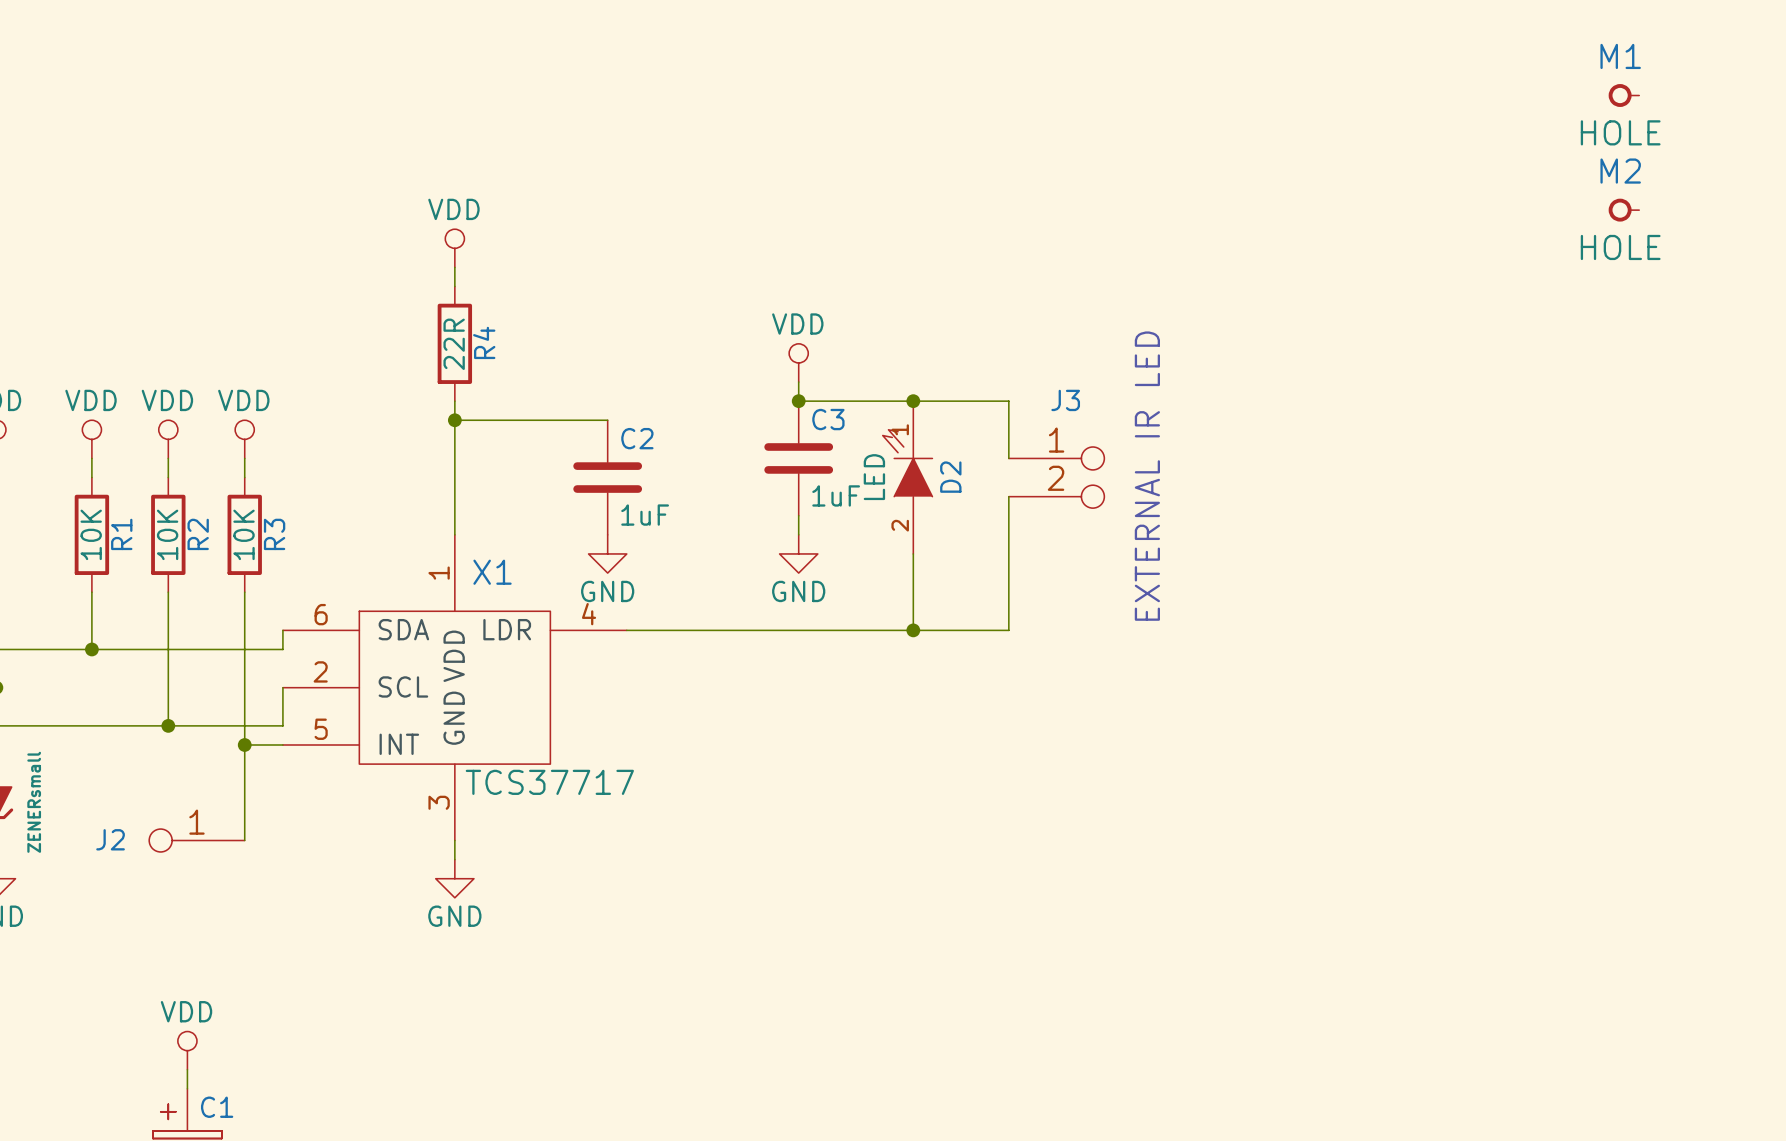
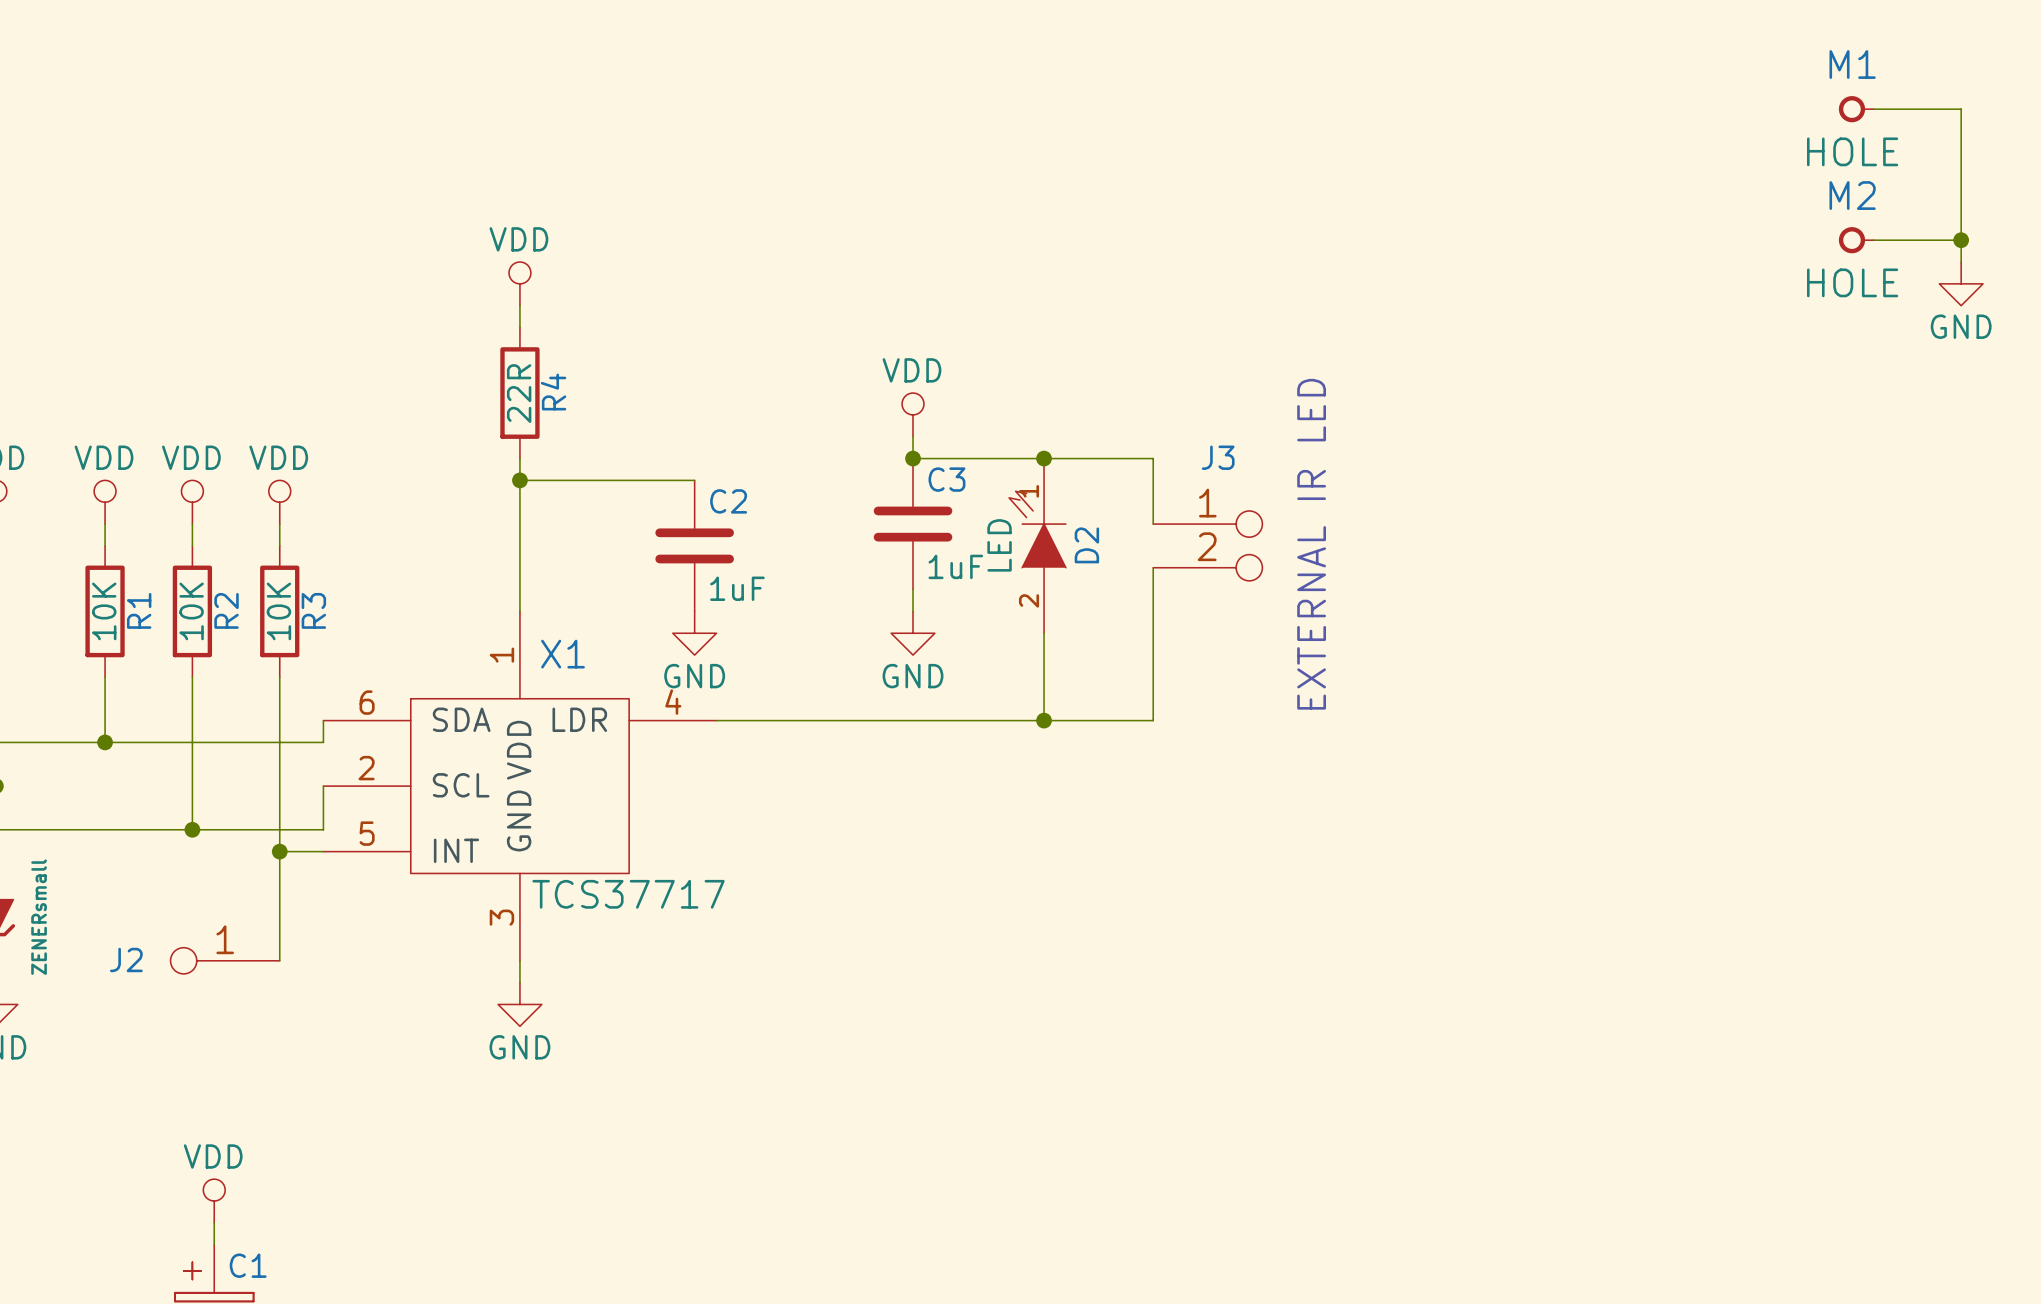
wire: none -> (1873, 109) (1961, 109) (1961, 262)
wire: none -> (1873, 240) (1961, 240)
junction: none -> (1961, 240)
power symbol: none -> GND (1961, 283)

